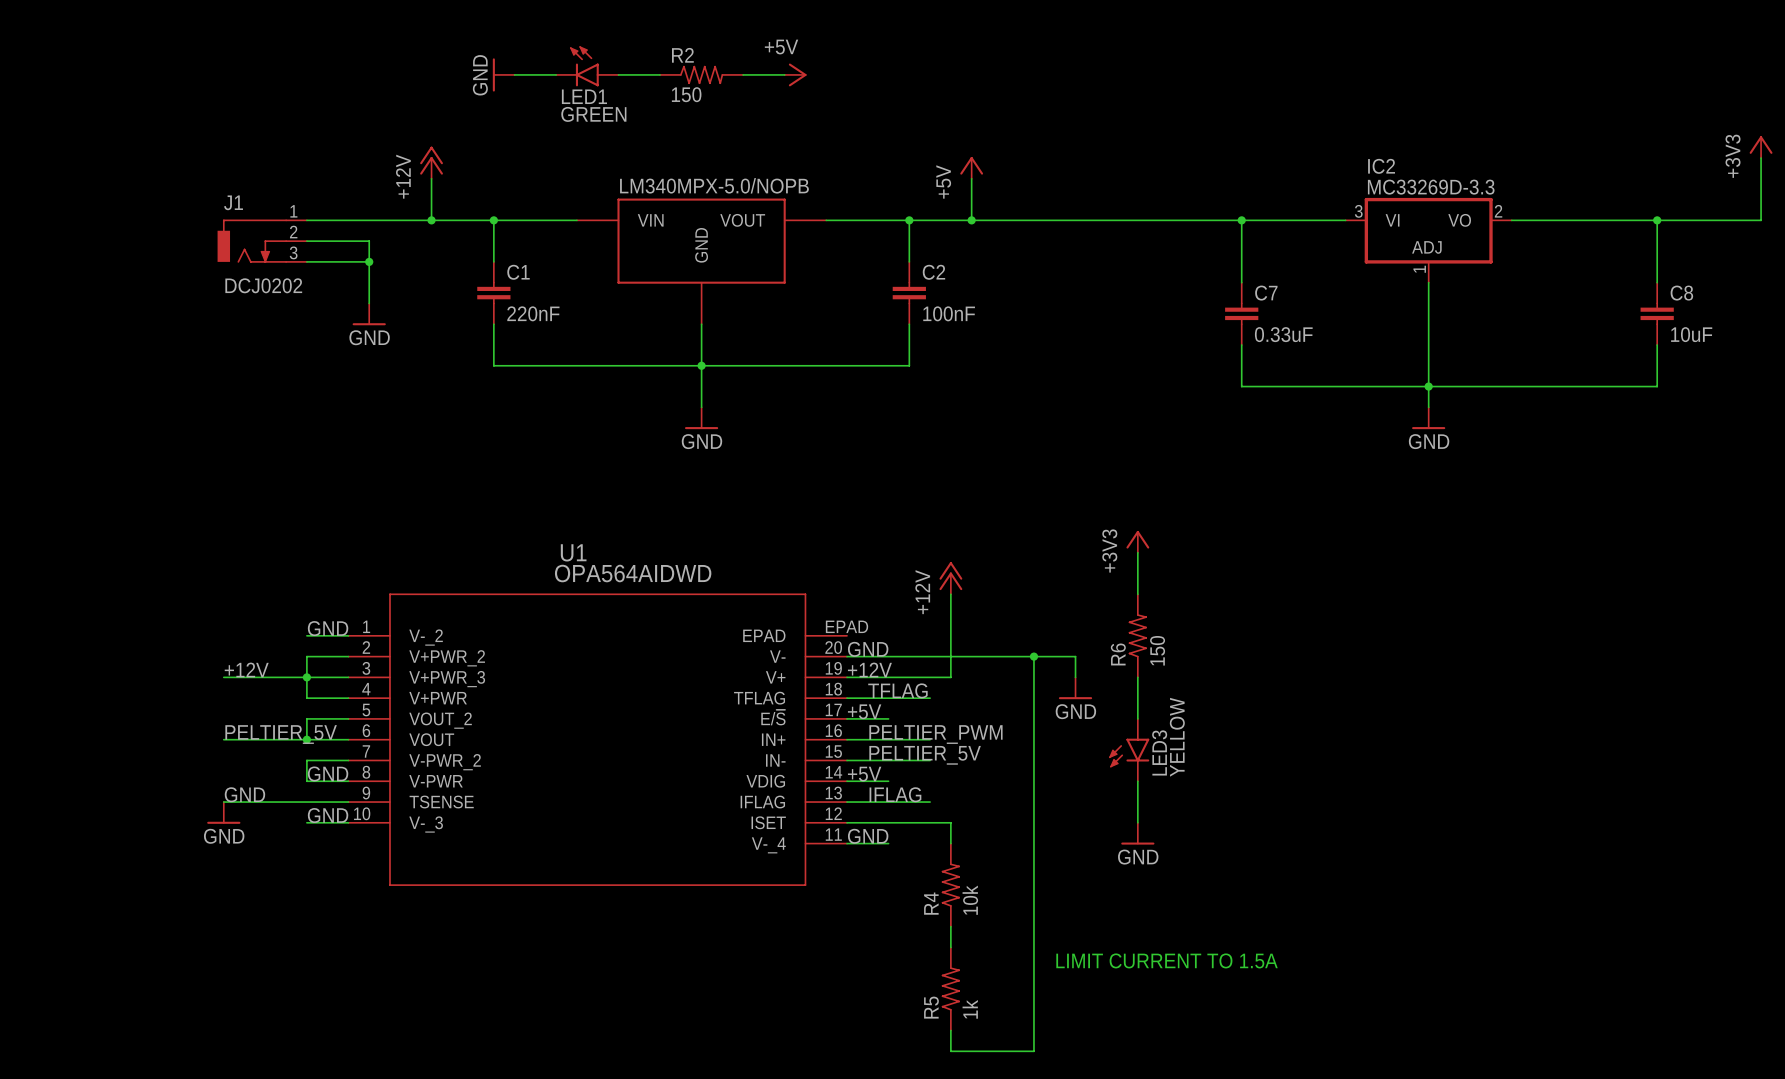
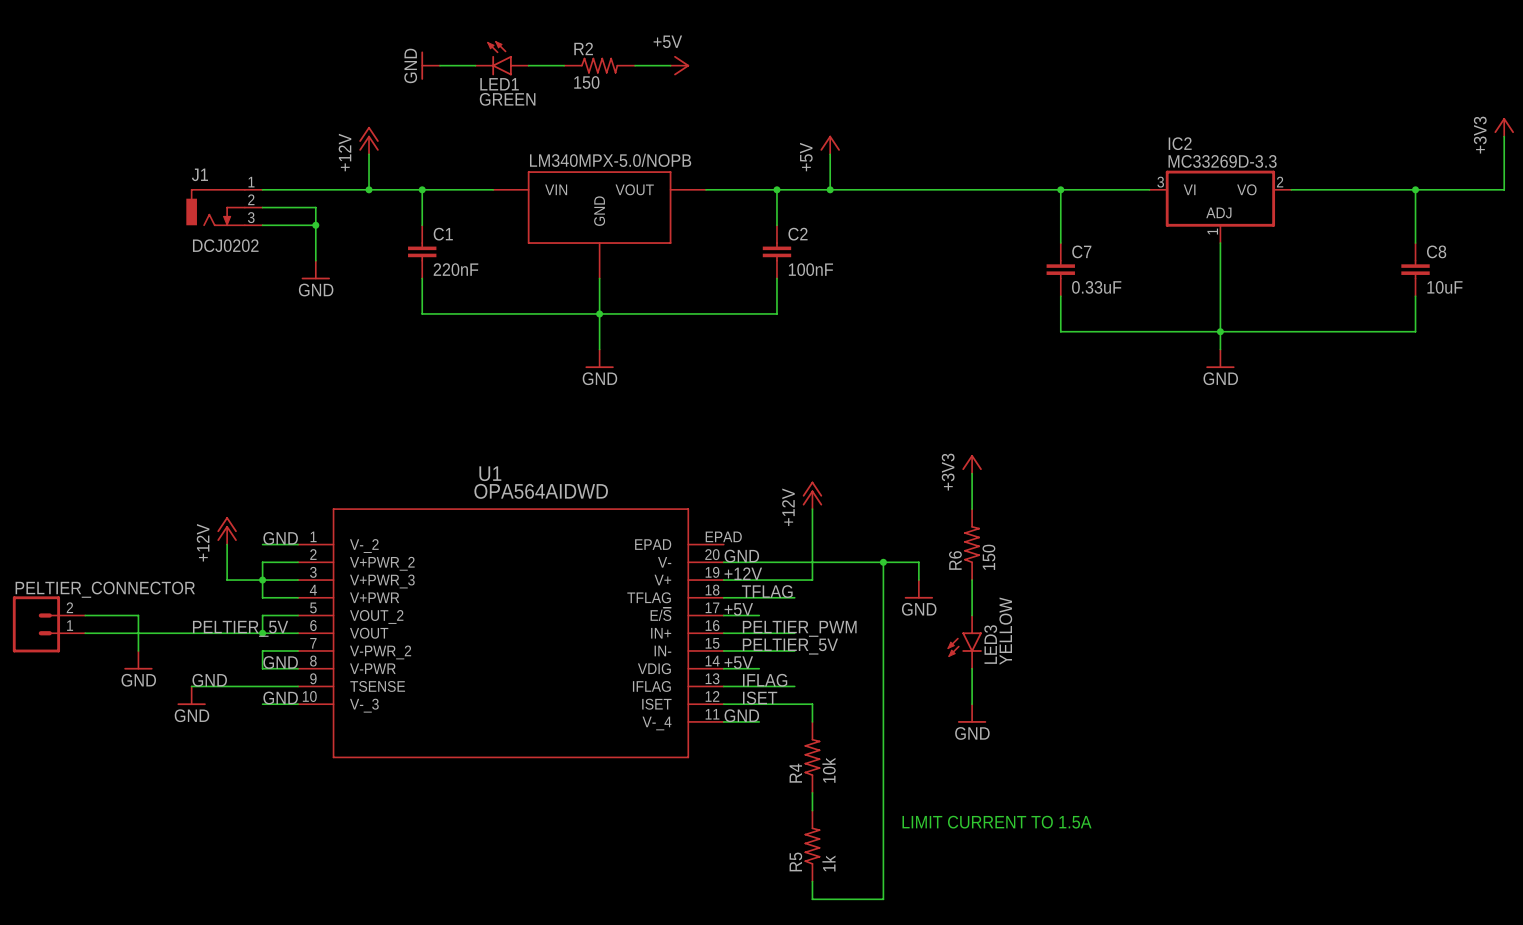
power symbol: none -> +12V (227, 530)
label: +12V (246, 670) -> none
wire: (223, 677) (265, 677) -> (227, 544) (227, 580)
wire: none -> (85, 615) (138, 615) (138, 650)
PELTIER_CONNECTOR: none -> (49, 624)
wire: none -> (85, 633) (191, 633)
power symbol: none -> GND (138, 660)
label: none -> ISET (760, 697)

